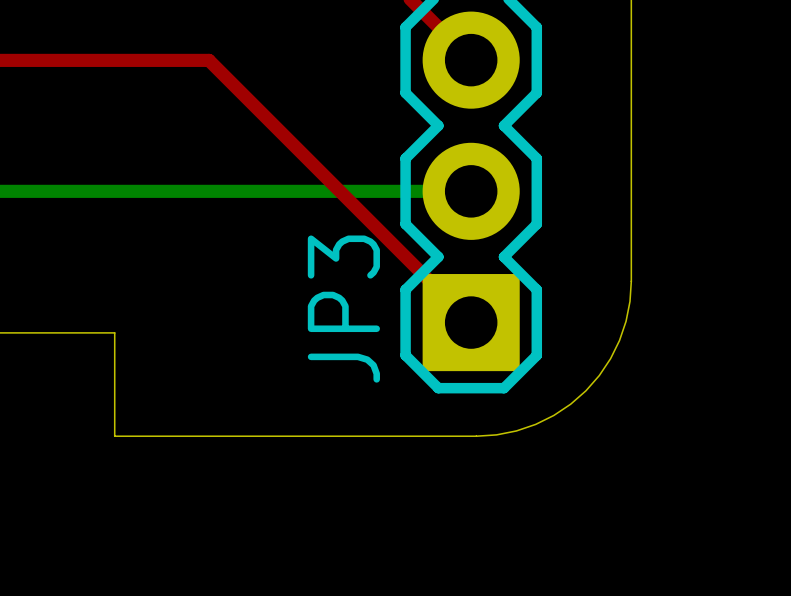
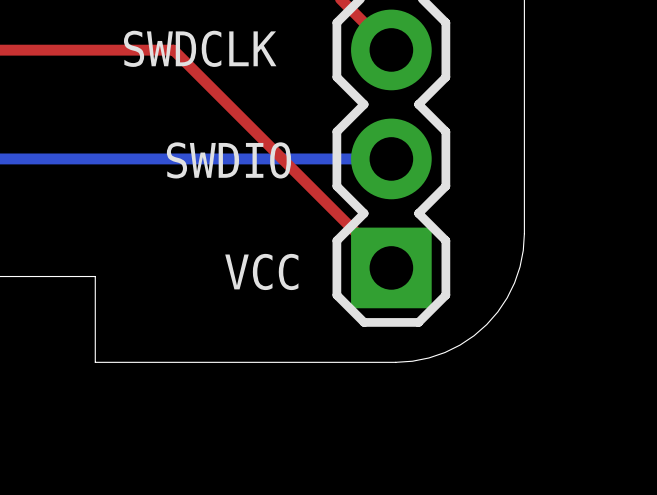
text: none -> SWDCLK (200, 48)
text: none -> SWDIO (228, 160)
JP3 name: JP3 (343, 309) -> none
text: none -> VCC (261, 271)

